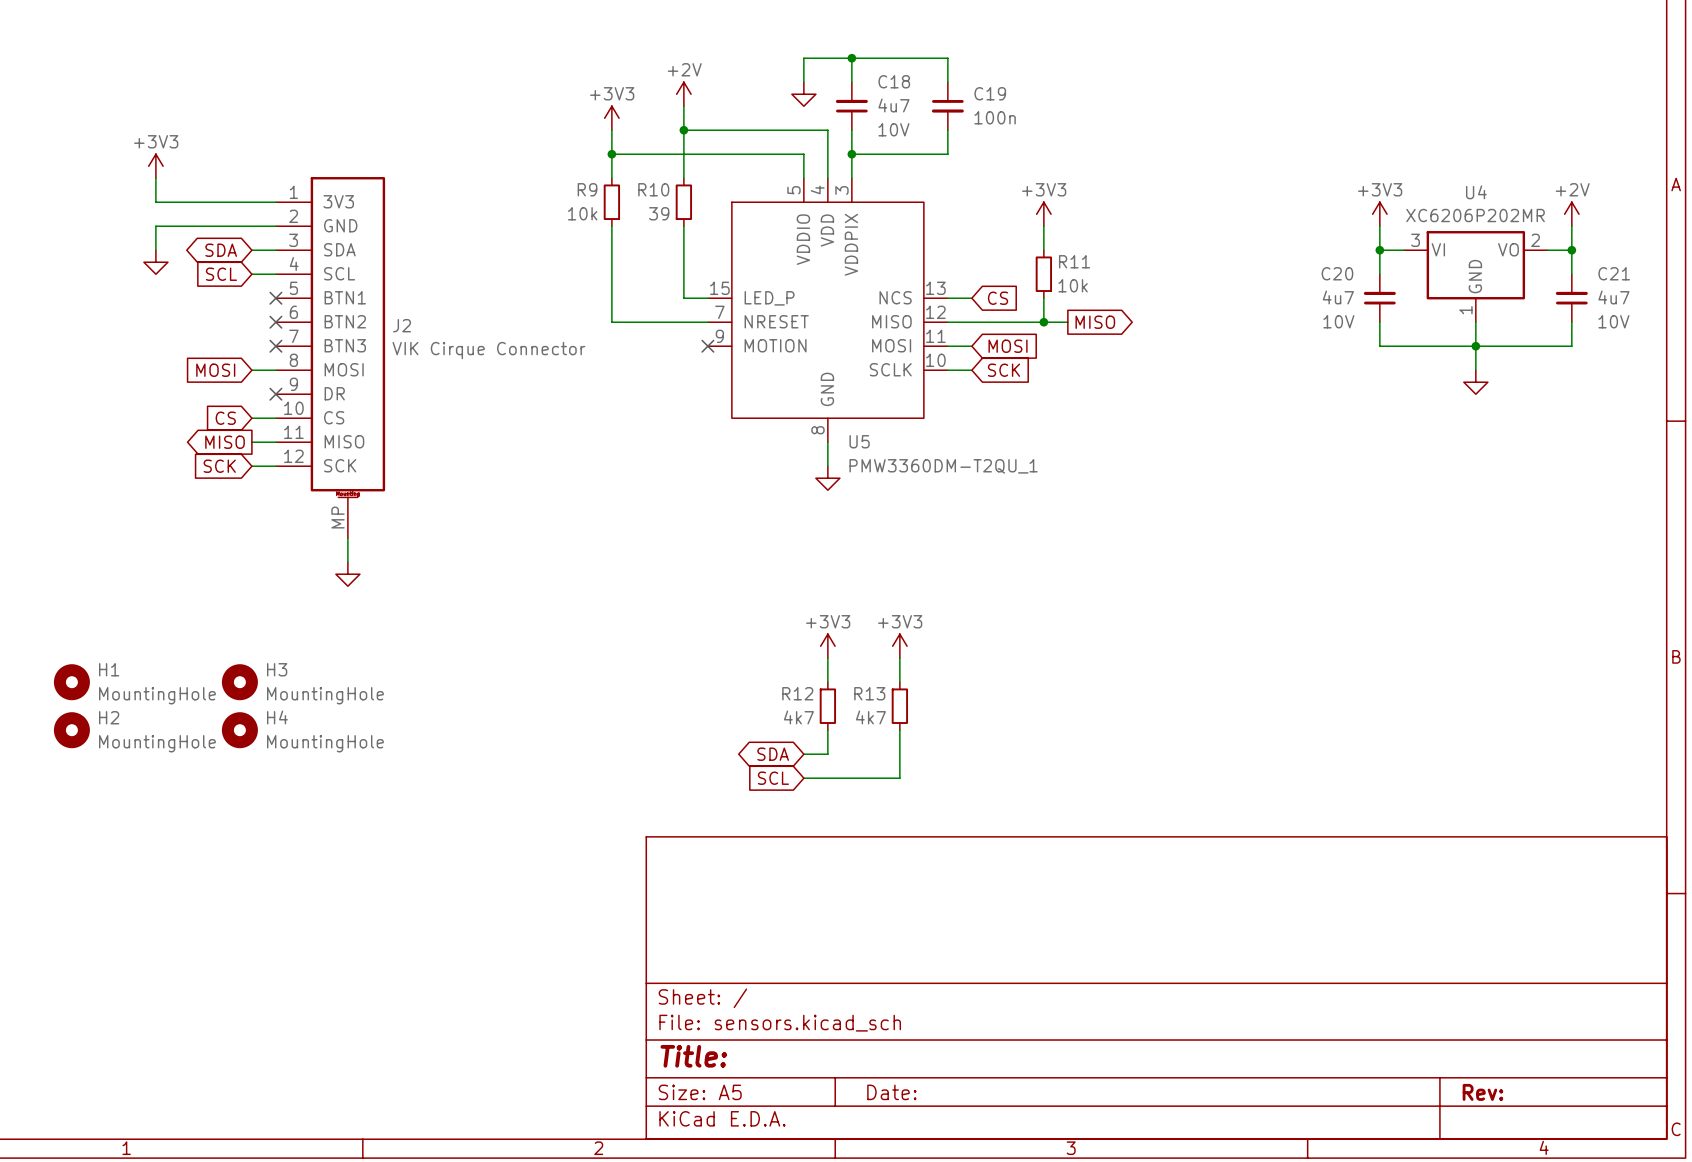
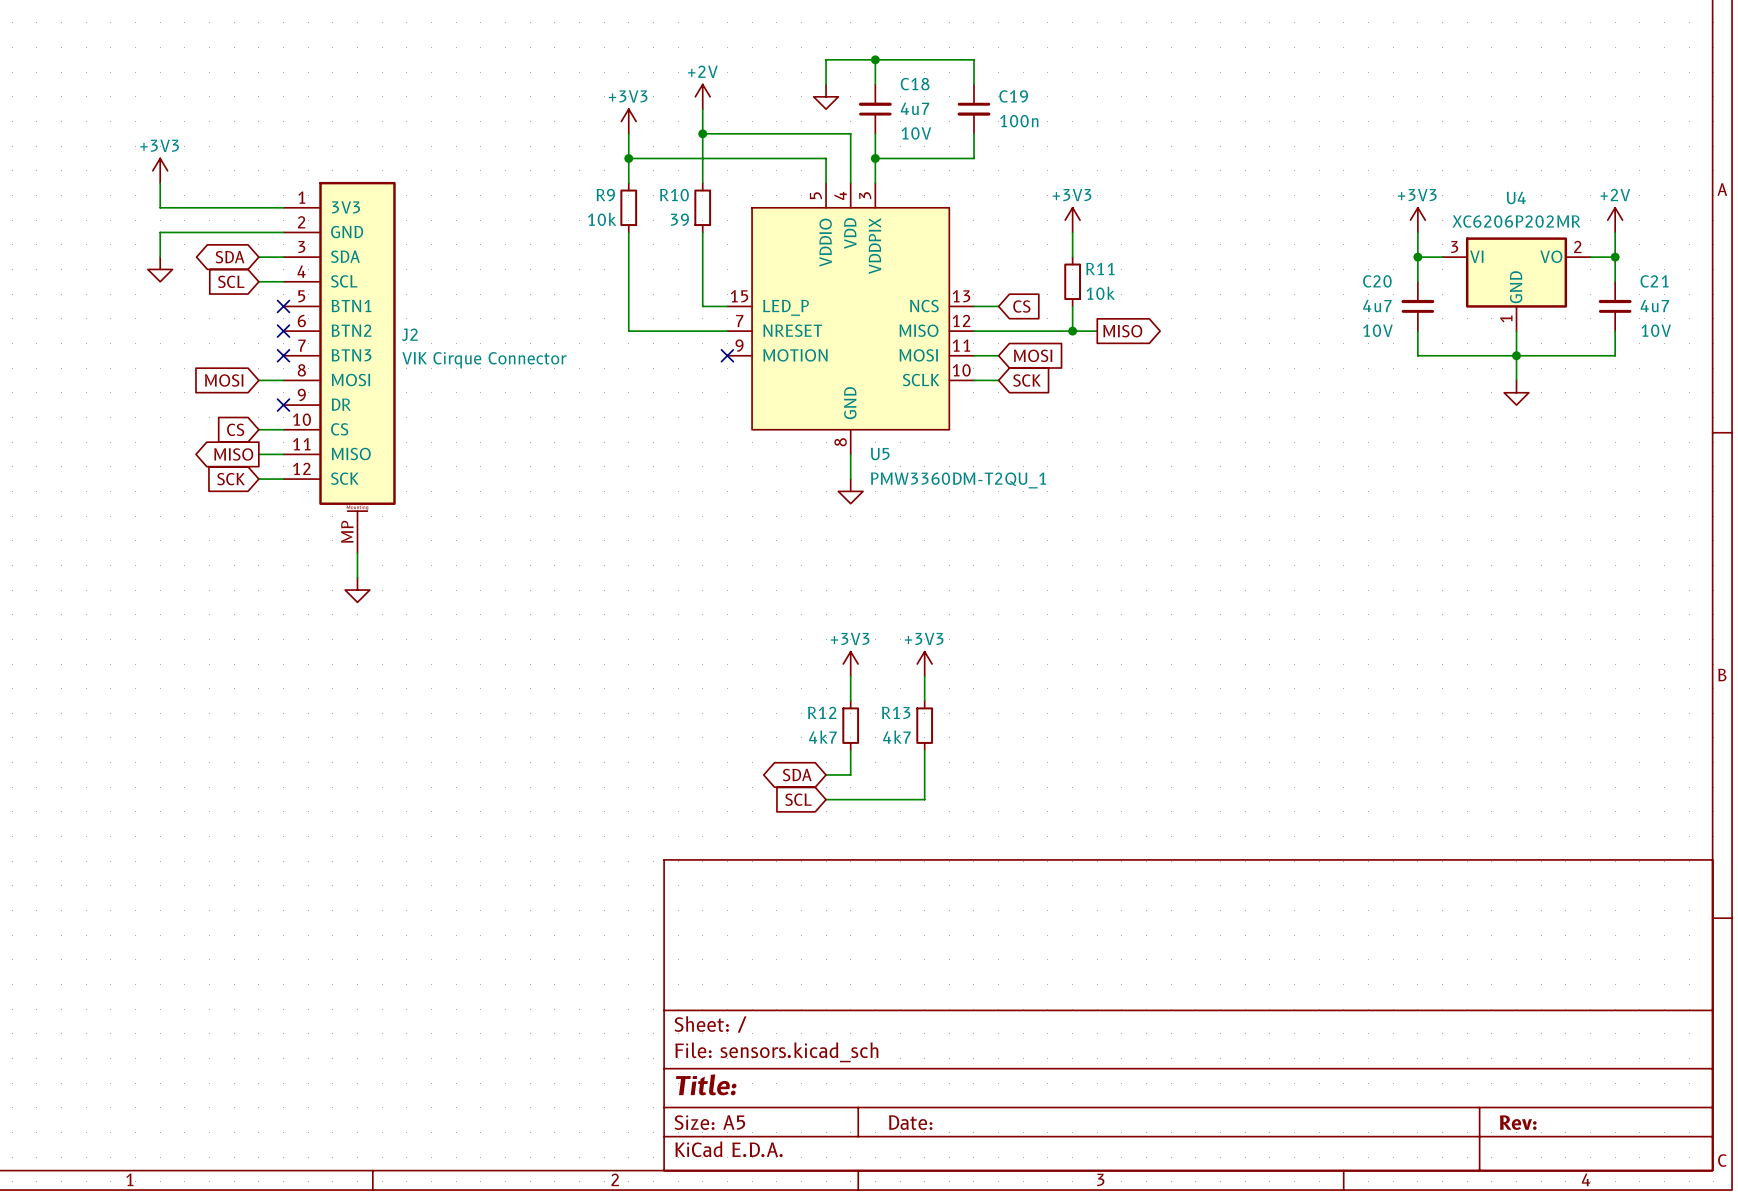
H1: MountingHole (71, 682) -> none
H3: MountingHole (239, 682) -> none
H2: MountingHole (71, 730) -> none
H4: MountingHole (239, 730) -> none

